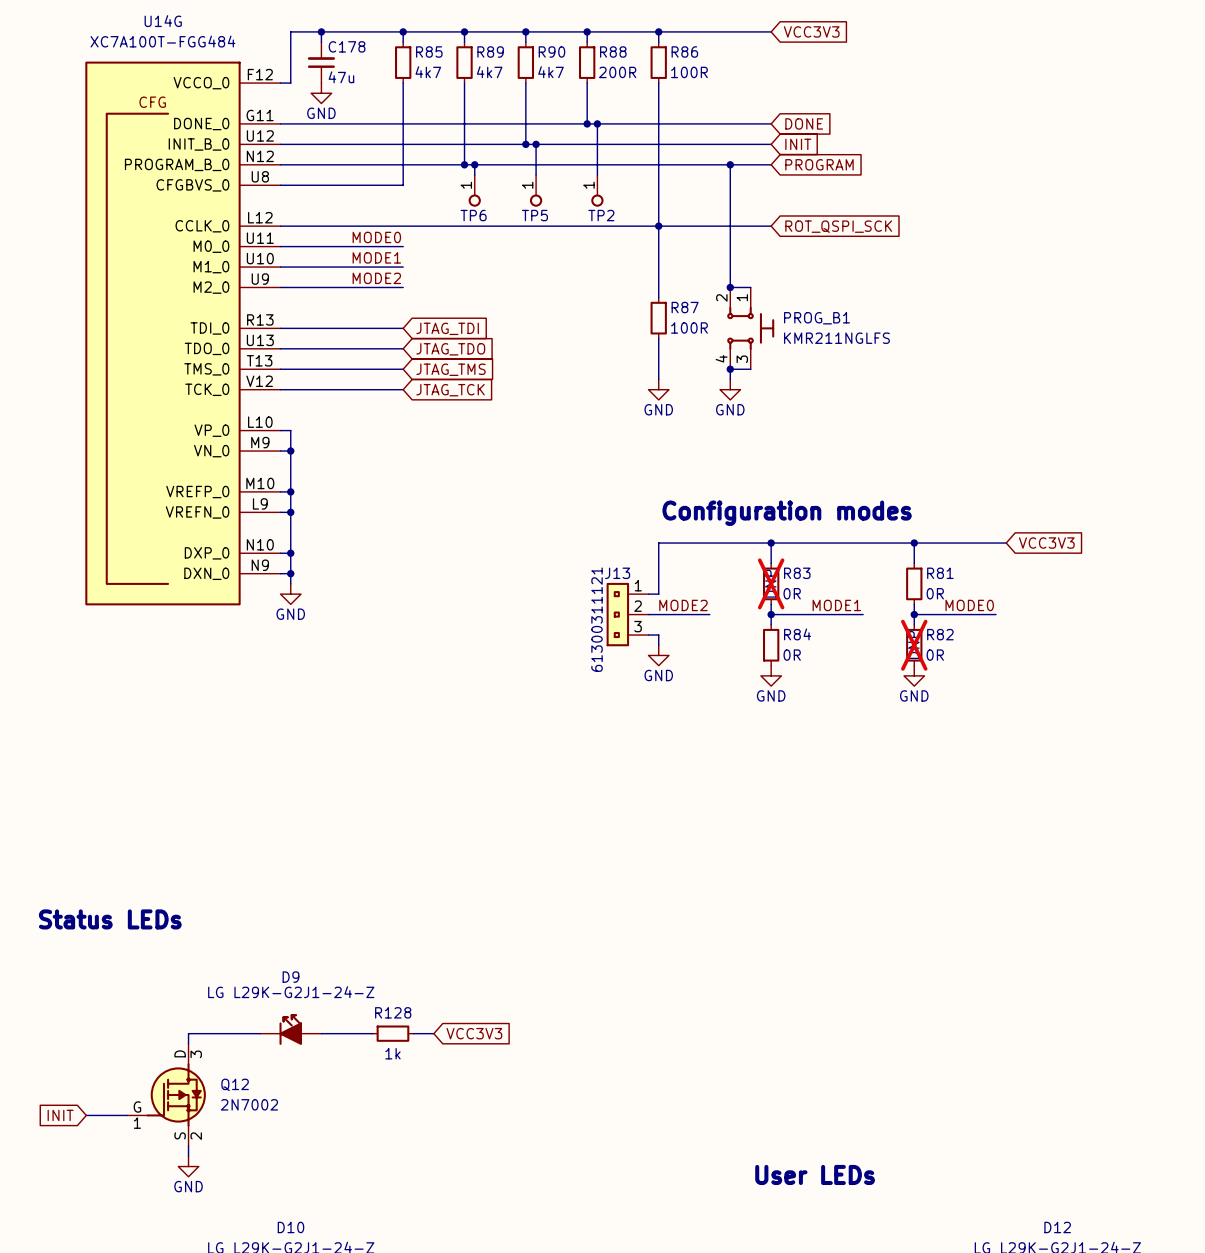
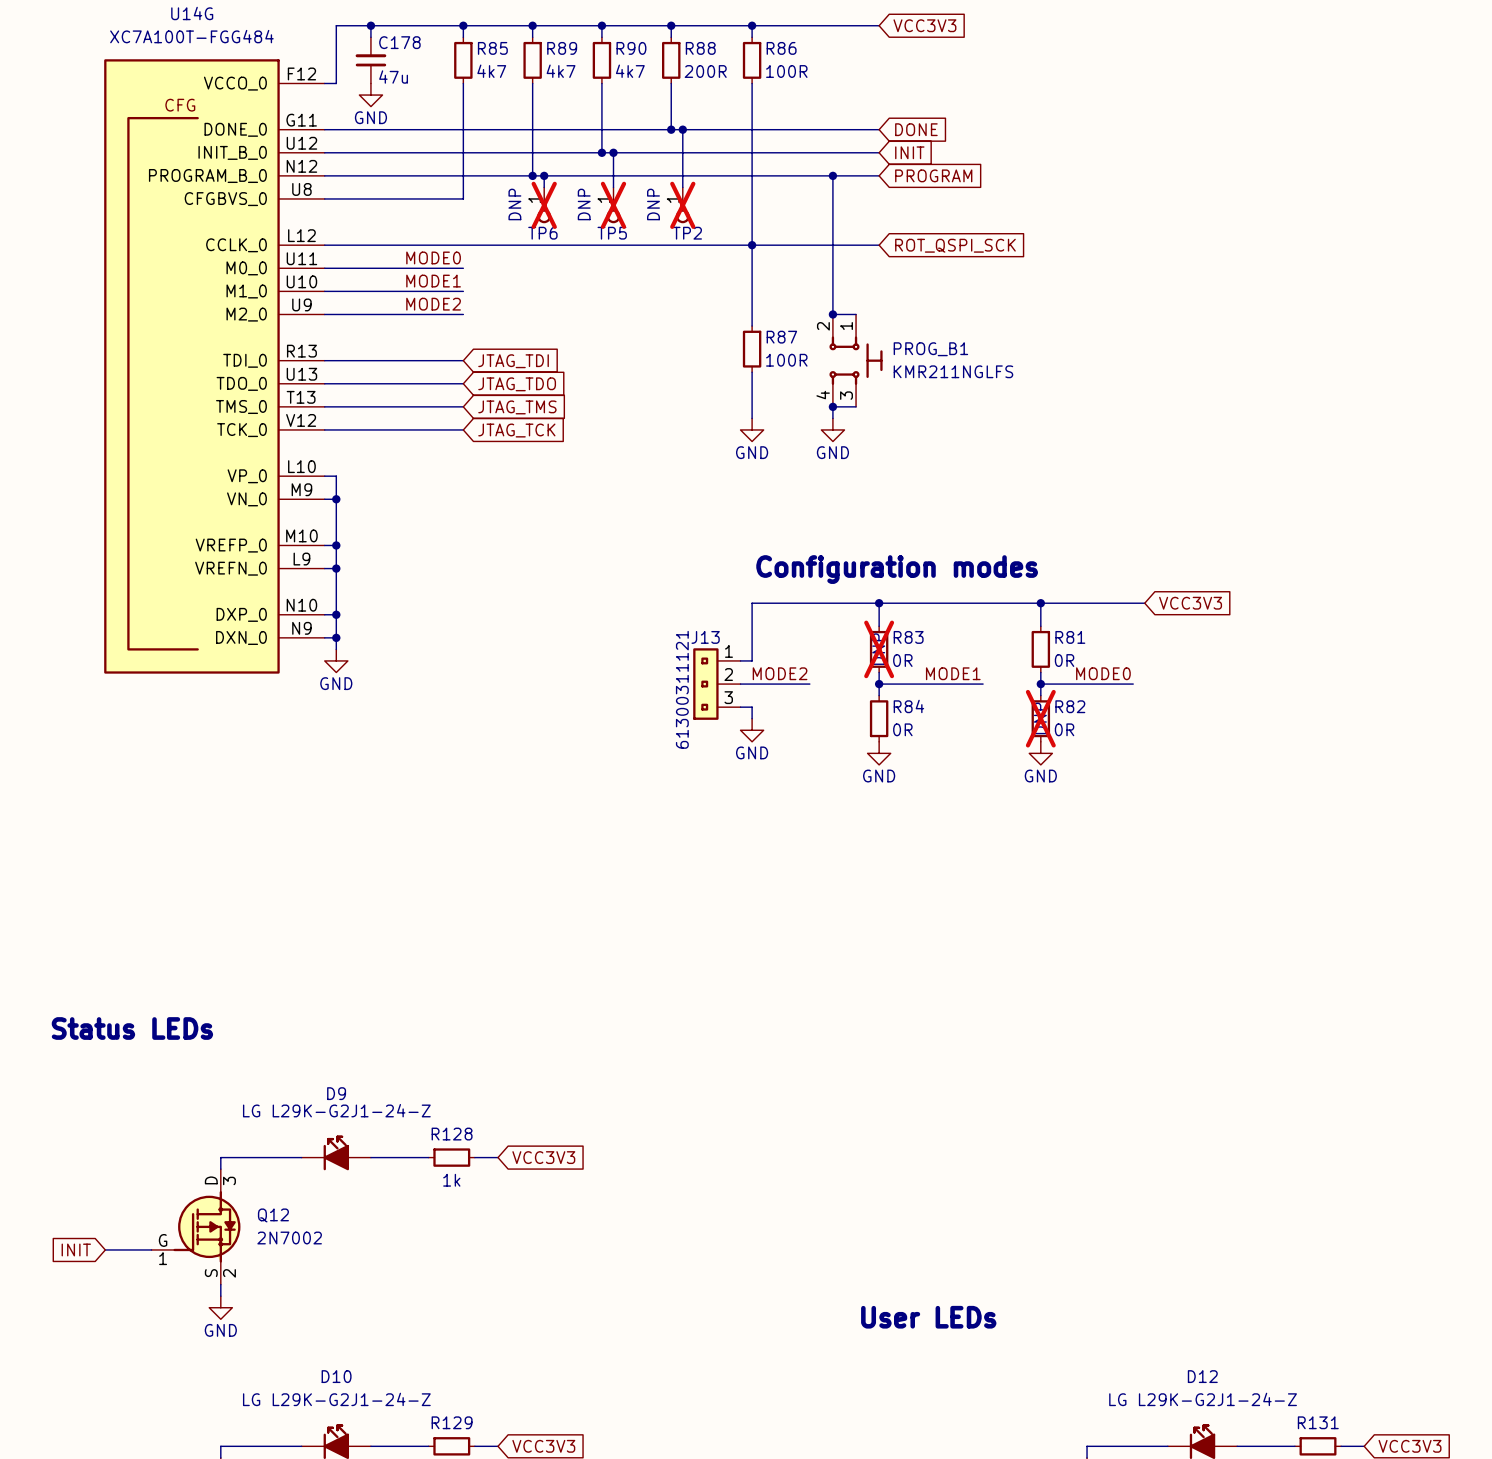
TP6 text: none -> DNP (514, 204)
TP6 do-not-place cross: none -> (544, 205)
TP5 text: none -> DNP (584, 204)
TP5 do-not-place cross: none -> (613, 205)
TP2 text: none -> DNP (653, 204)
TP2 do-not-place cross: none -> (682, 205)

